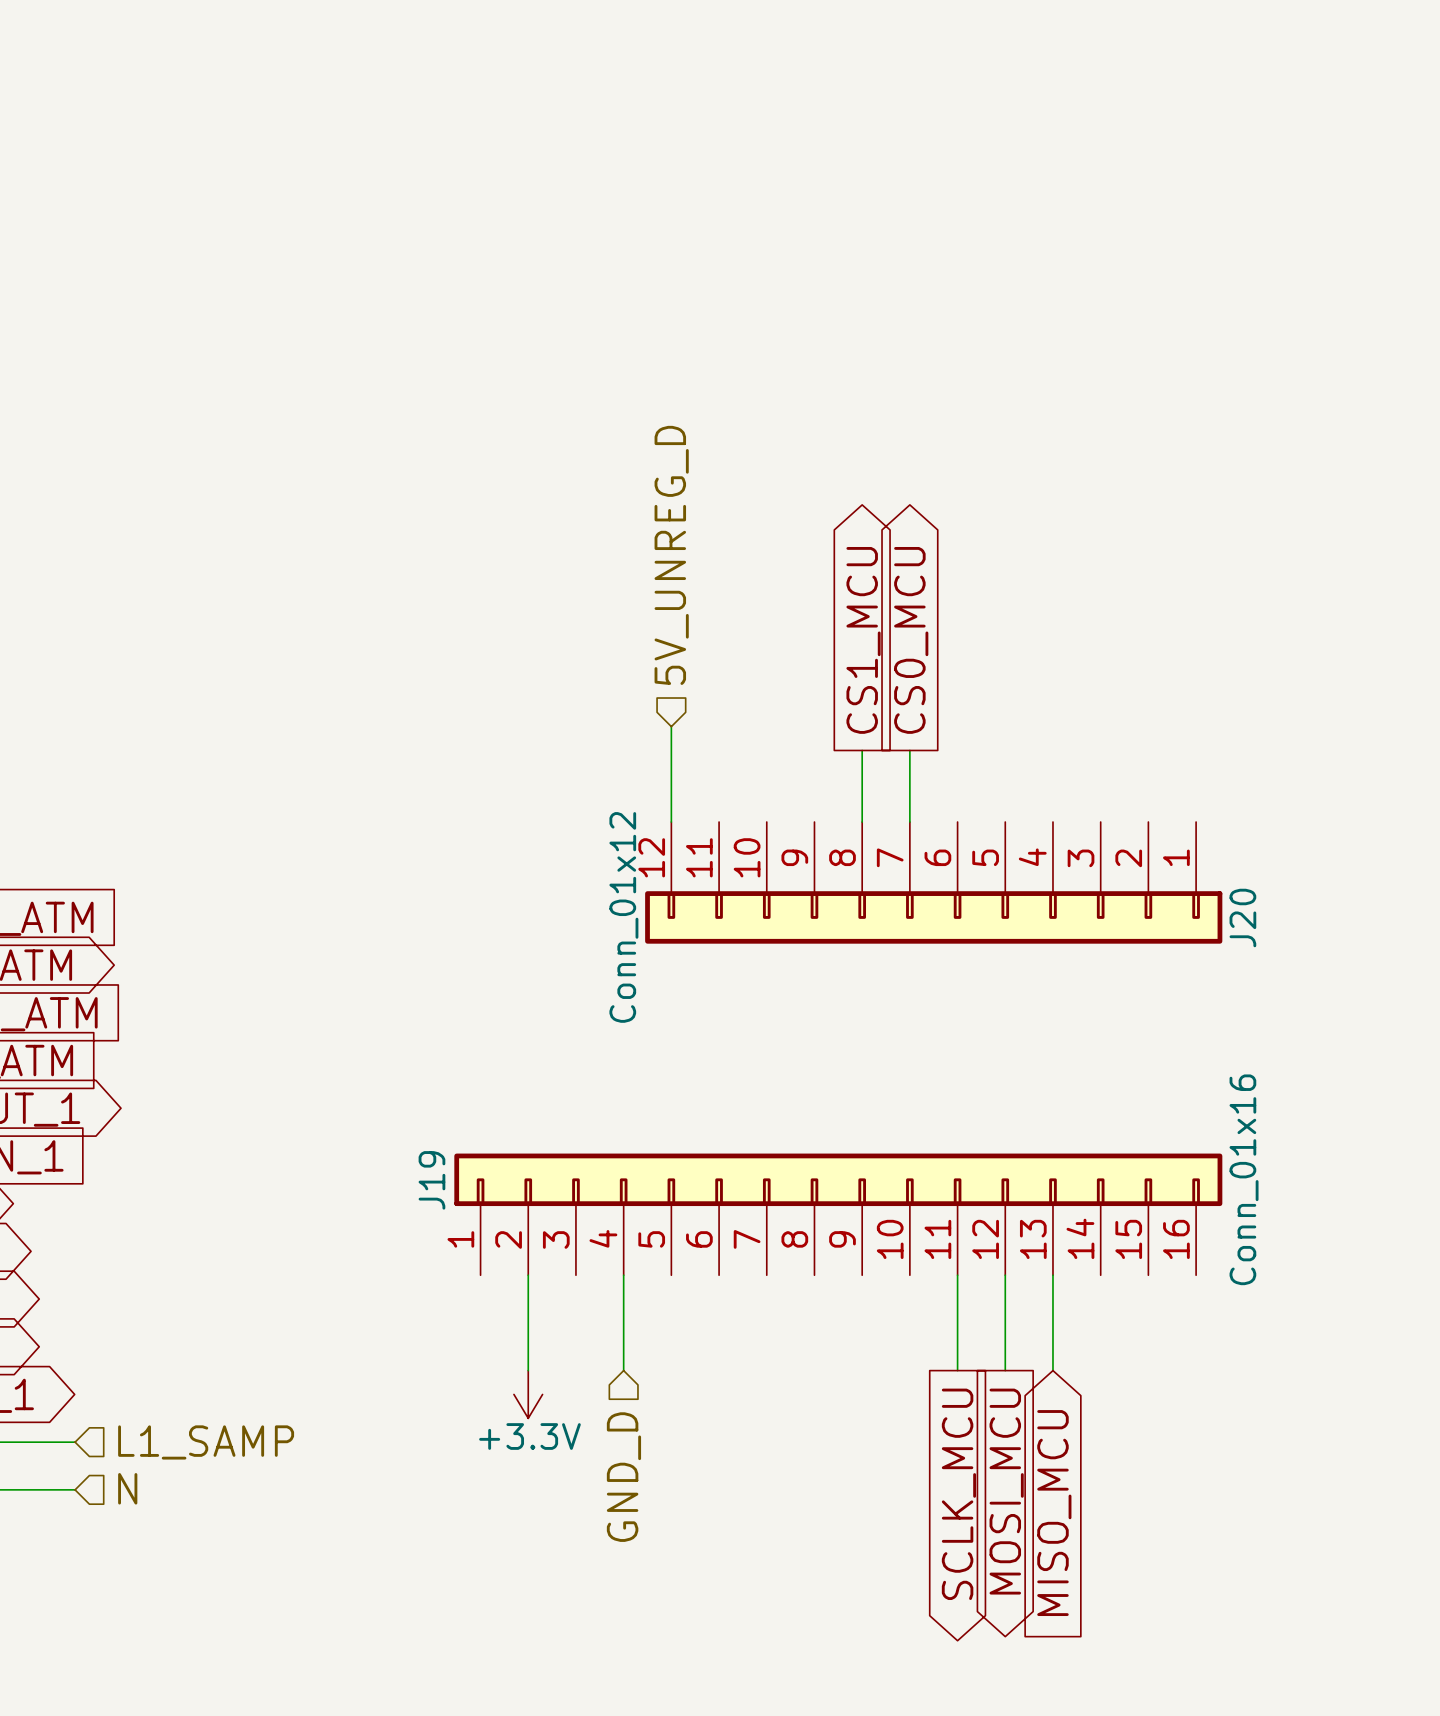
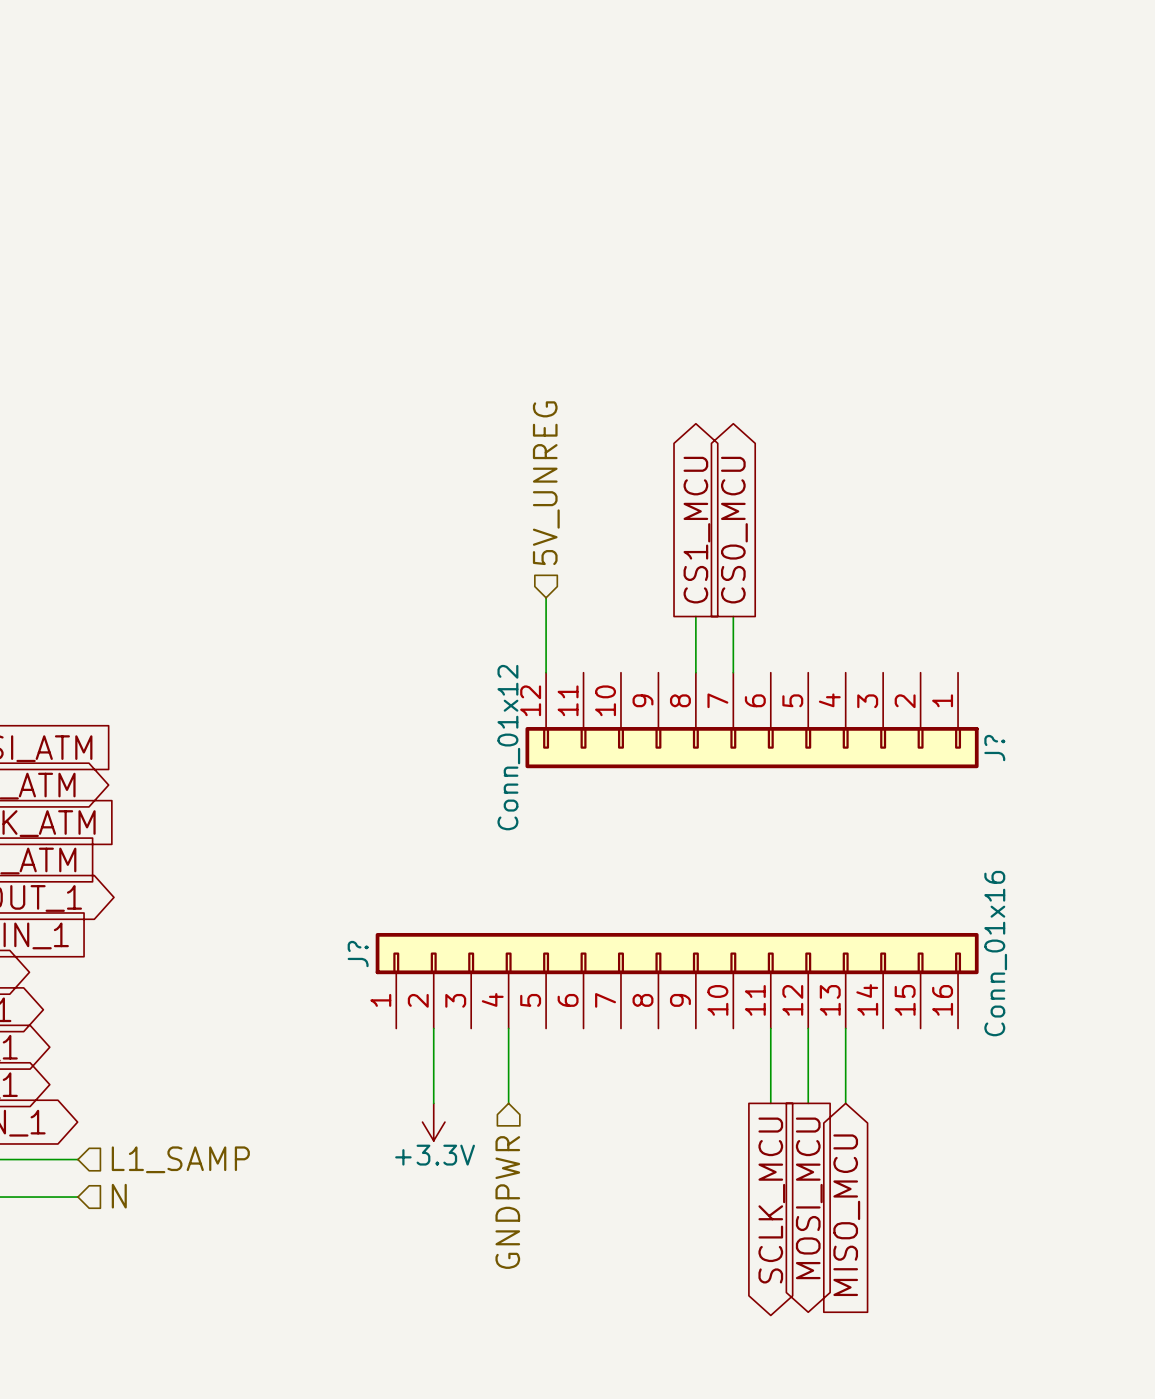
hierarchical label: 5V_UNREG_D (671, 555) -> 5V_UNREG (546, 483)
J20 name: J20 (1242, 918) -> J? (994, 748)
J19 name: J19 (431, 1180) -> J? (358, 954)
hierarchical label: GND_D (623, 1477) -> GNDPWR (507, 1202)

